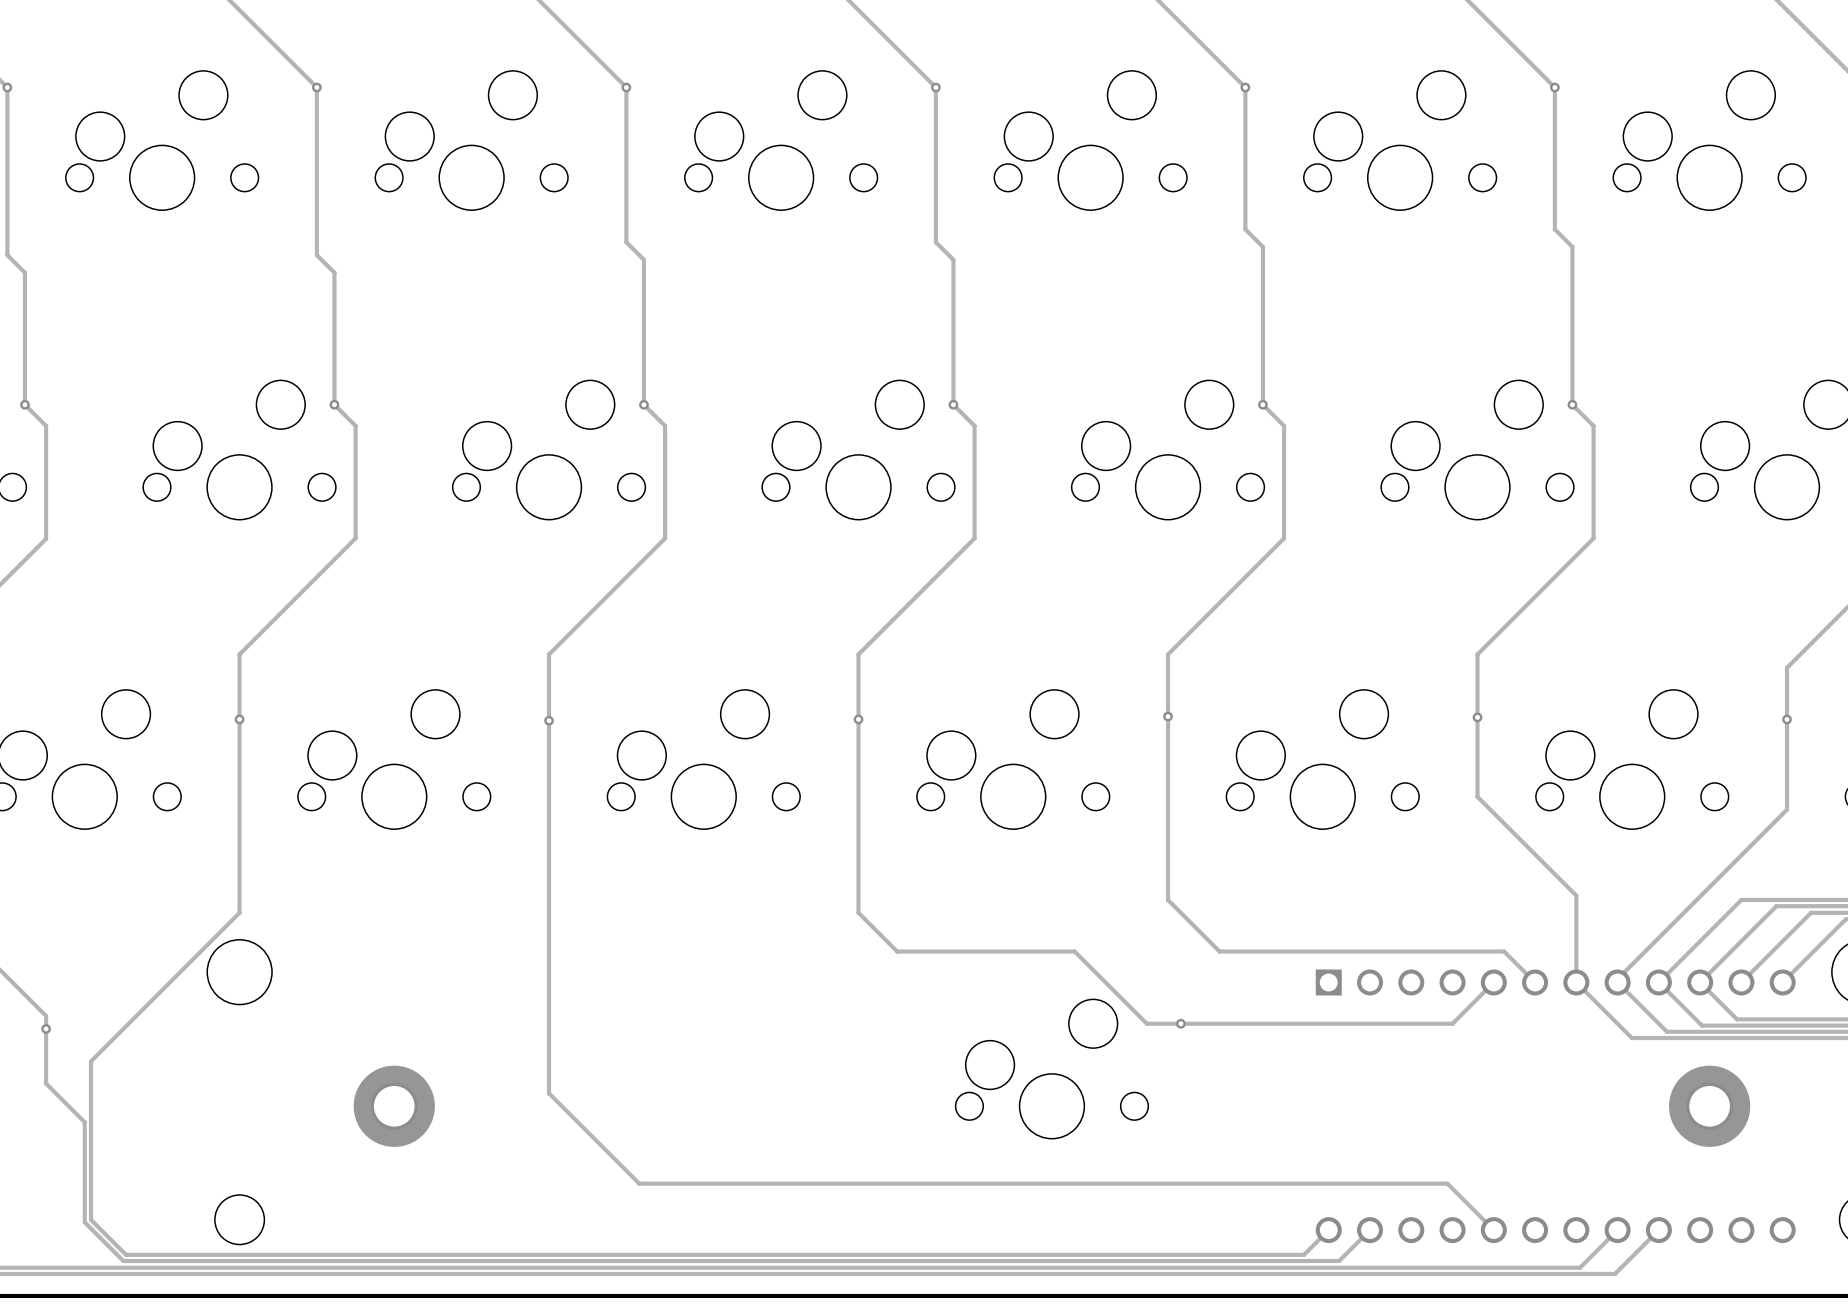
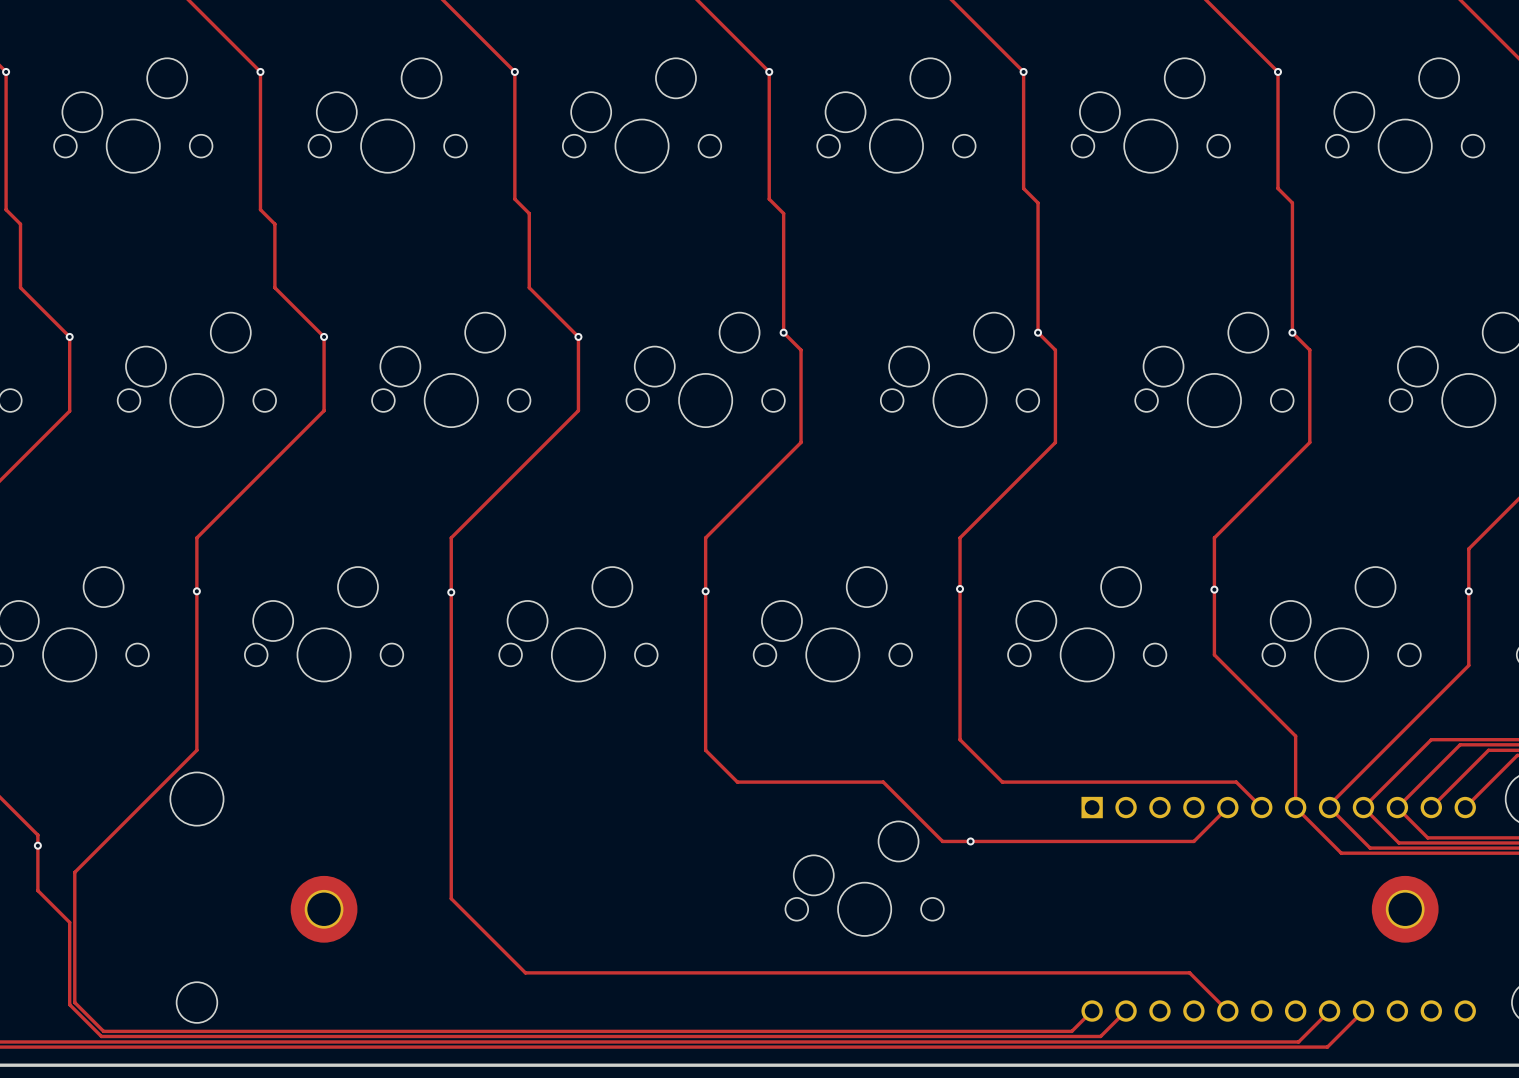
track: (24, 350) (24, 404) (46, 425) (46, 538) -> (20, 287) (69, 336) (69, 411) (37, 442)
track: (334, 350) (334, 404) (355, 425) (355, 538) -> (274, 287) (324, 336) (324, 410) (292, 442)
track: (643, 350) (643, 404) (665, 425) (665, 538) -> (529, 287) (578, 336) (578, 410) (546, 442)
via position: (24, 404) -> (69, 336)
via position: (334, 404) -> (324, 336)
via position: (643, 404) -> (578, 336)

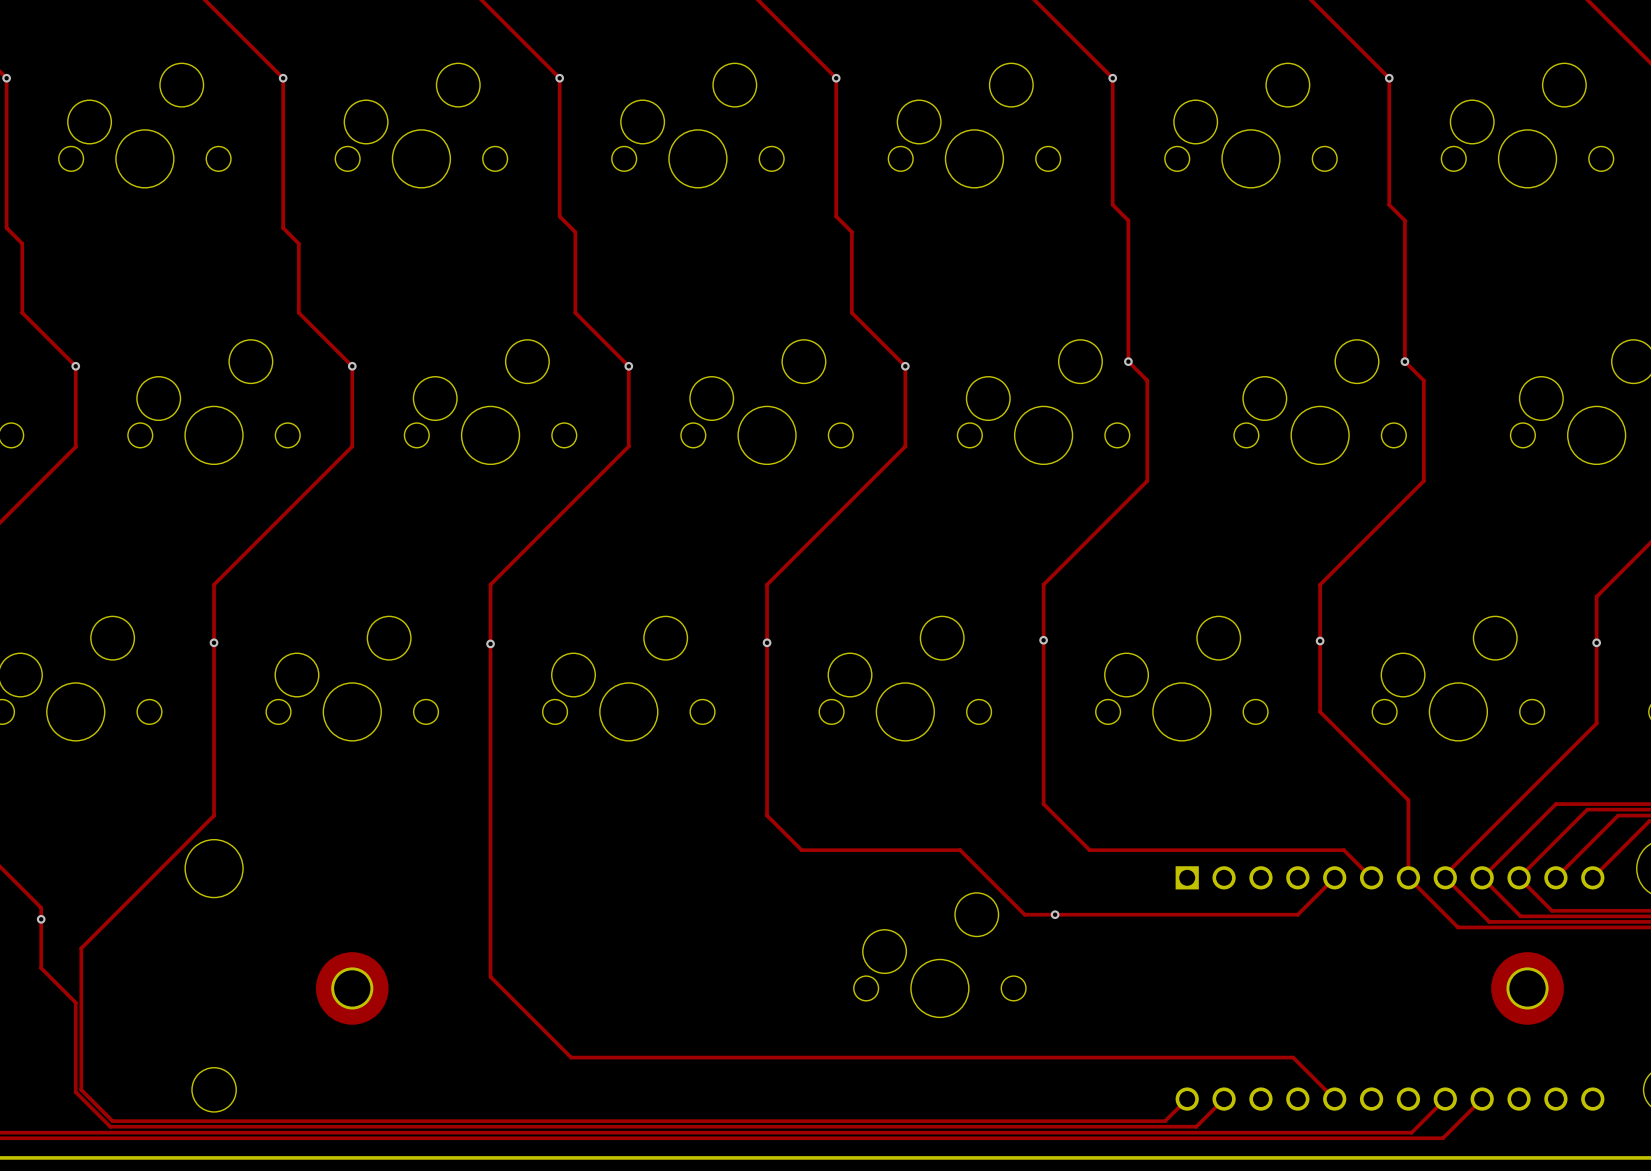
track: (783, 287) (783, 332) (801, 350) (801, 442) -> (851, 312) (905, 366) (905, 446) (870, 481)
via position: (783, 332) -> (905, 366)

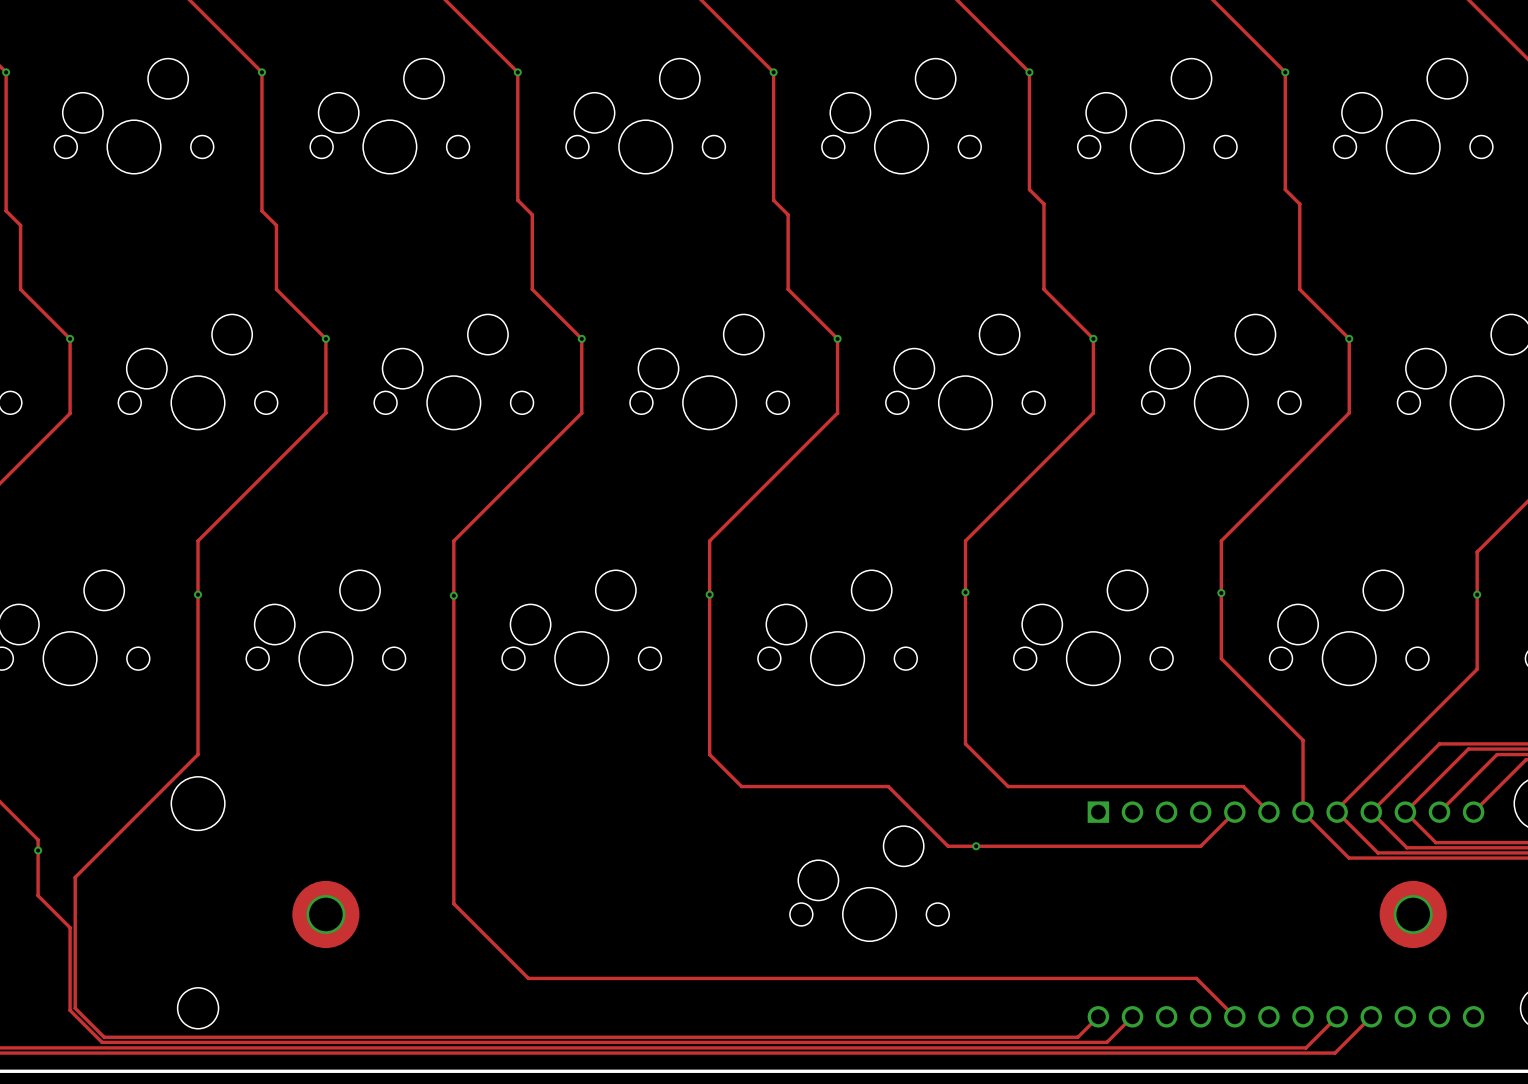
track: (1128, 312) (1128, 361) (1147, 380) (1147, 481) -> (1043, 289) (1093, 338) (1093, 413) (1061, 445)
track: (1404, 312) (1404, 361) (1423, 380) (1423, 481) -> (1299, 289) (1349, 338) (1349, 413) (1317, 445)
via position: (1128, 361) -> (1093, 338)
via position: (1404, 361) -> (1349, 338)

